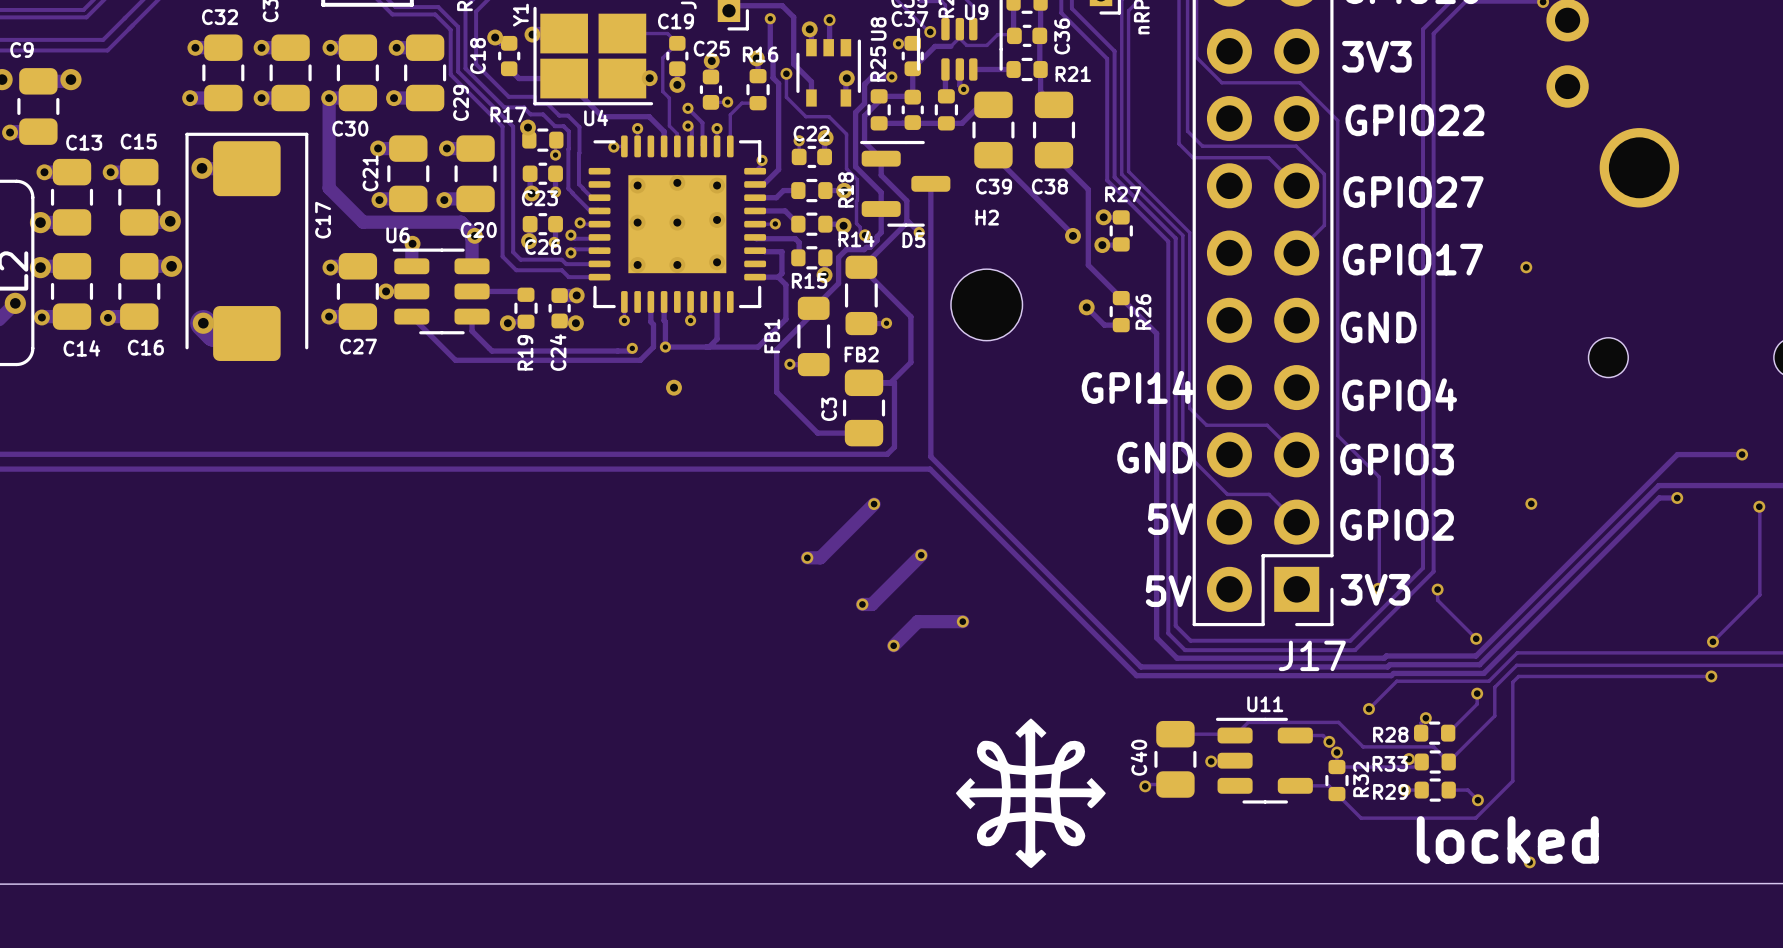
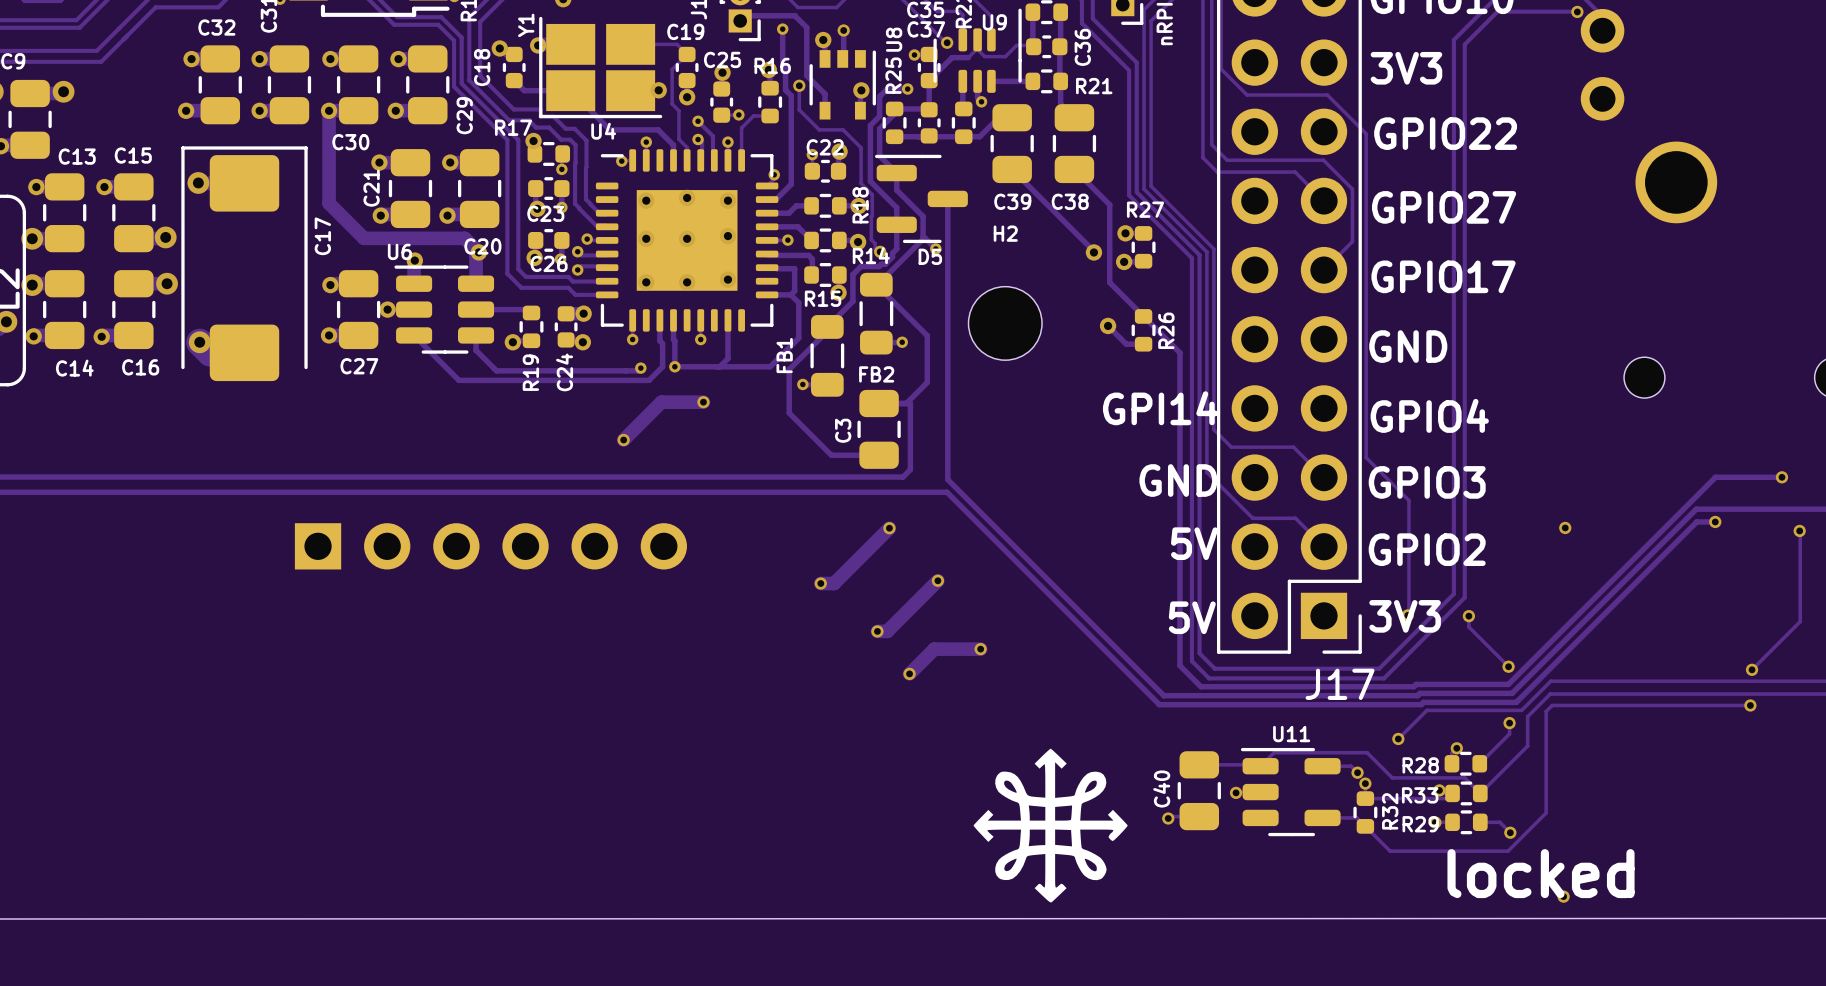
via: (1526, 267) -> none
track: none -> (703, 402) (661, 402) (623, 440)
via: none -> (703, 402)
via: (673, 387) -> none
via: none -> (623, 440)
part: none -> (490, 546)

